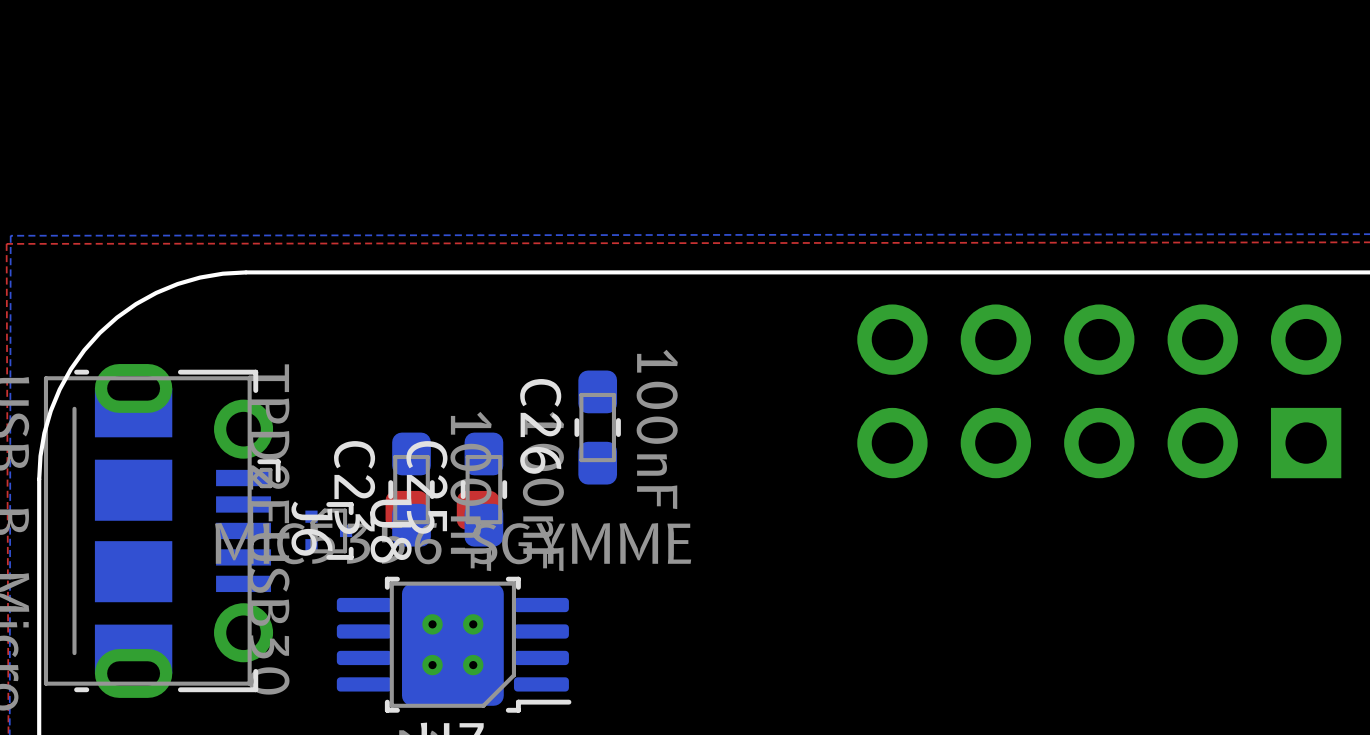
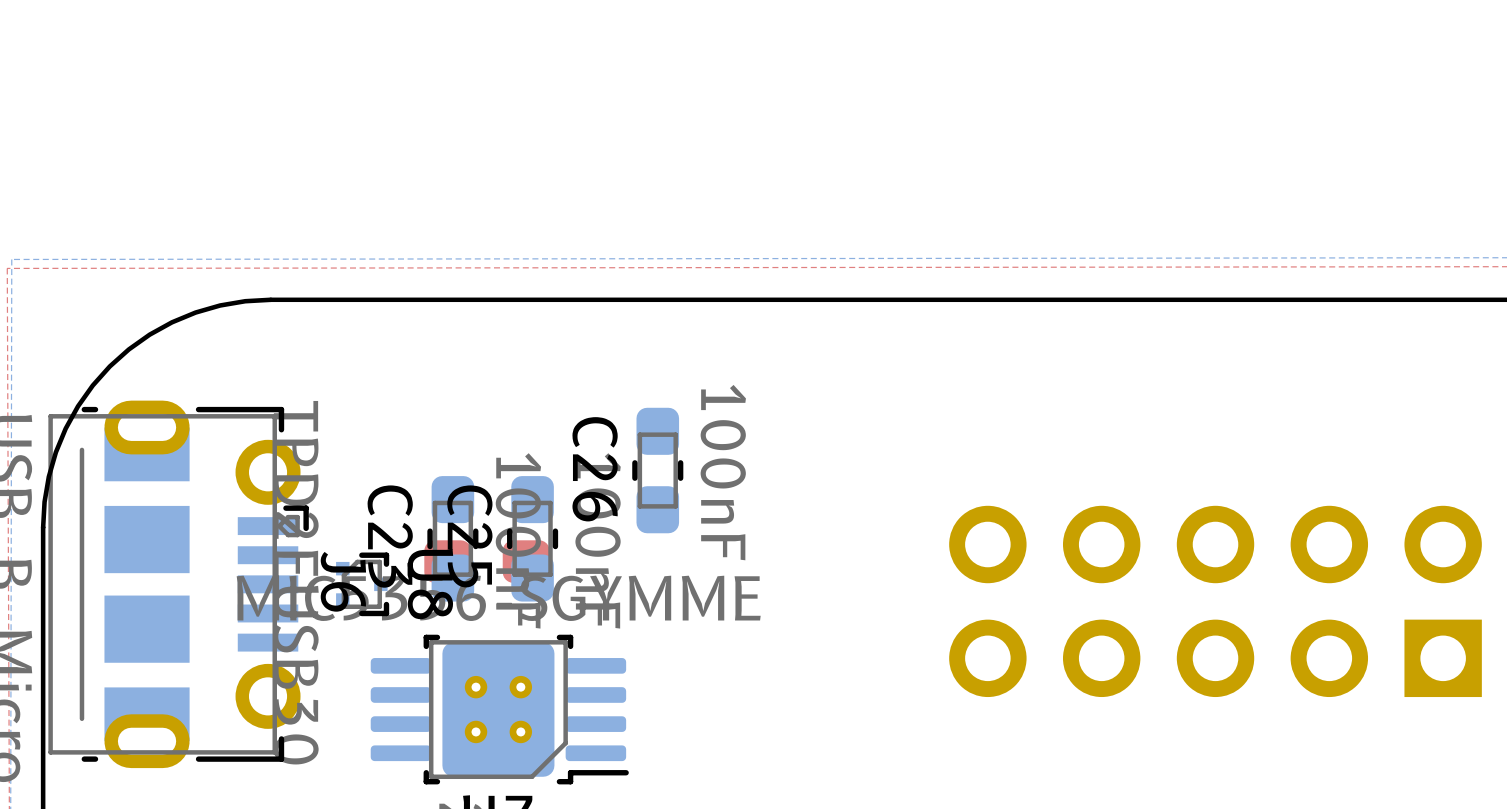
part position: (1099, 391) -> (1215, 601)

